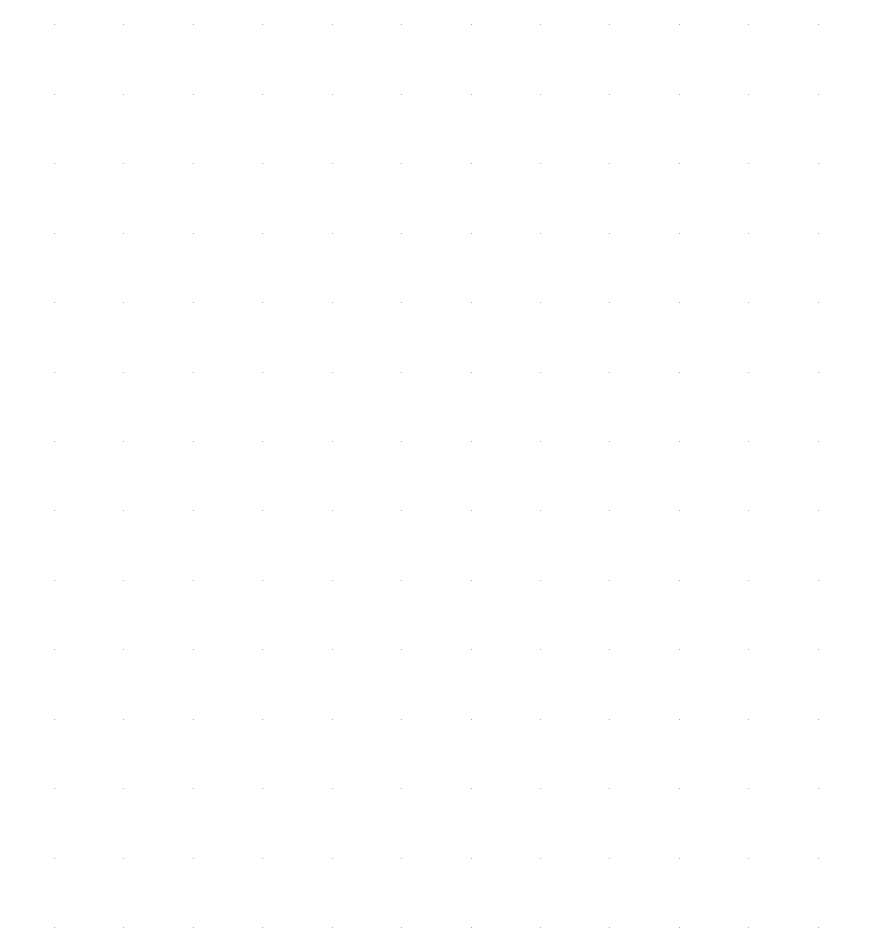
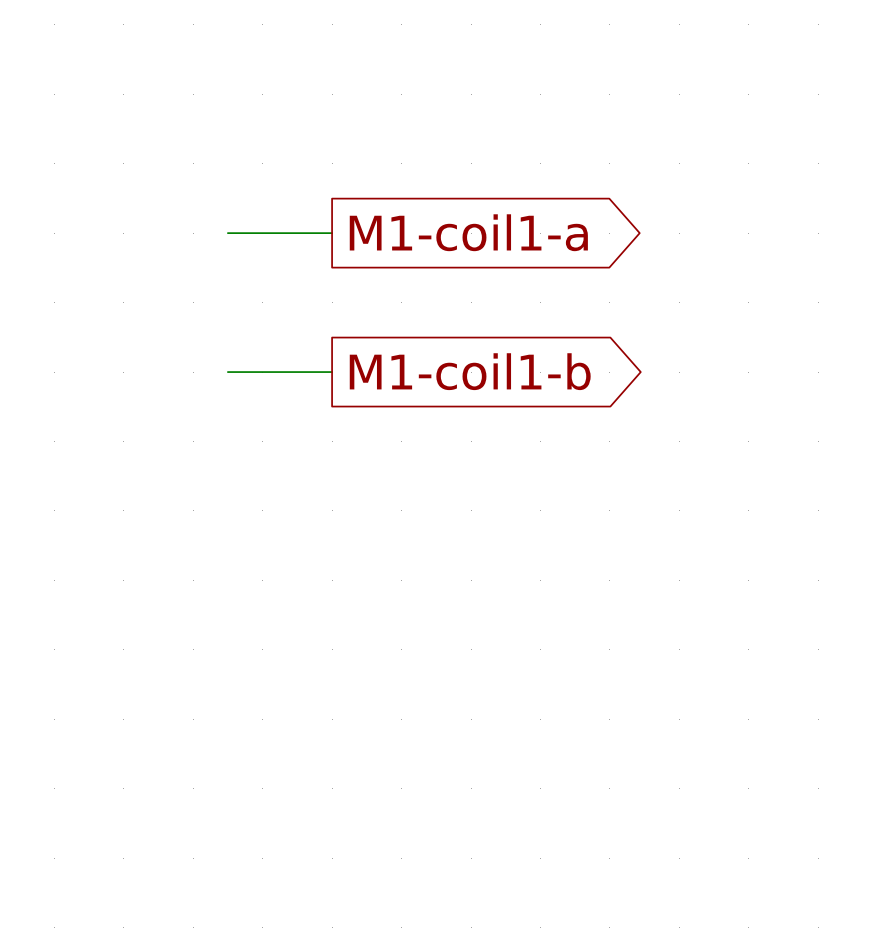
global label: none -> M1-coil1-a (468, 232)
wire: none -> (227, 233) (332, 233)
global label: none -> M1-coil1-b (470, 371)
wire: none -> (227, 372) (332, 372)

